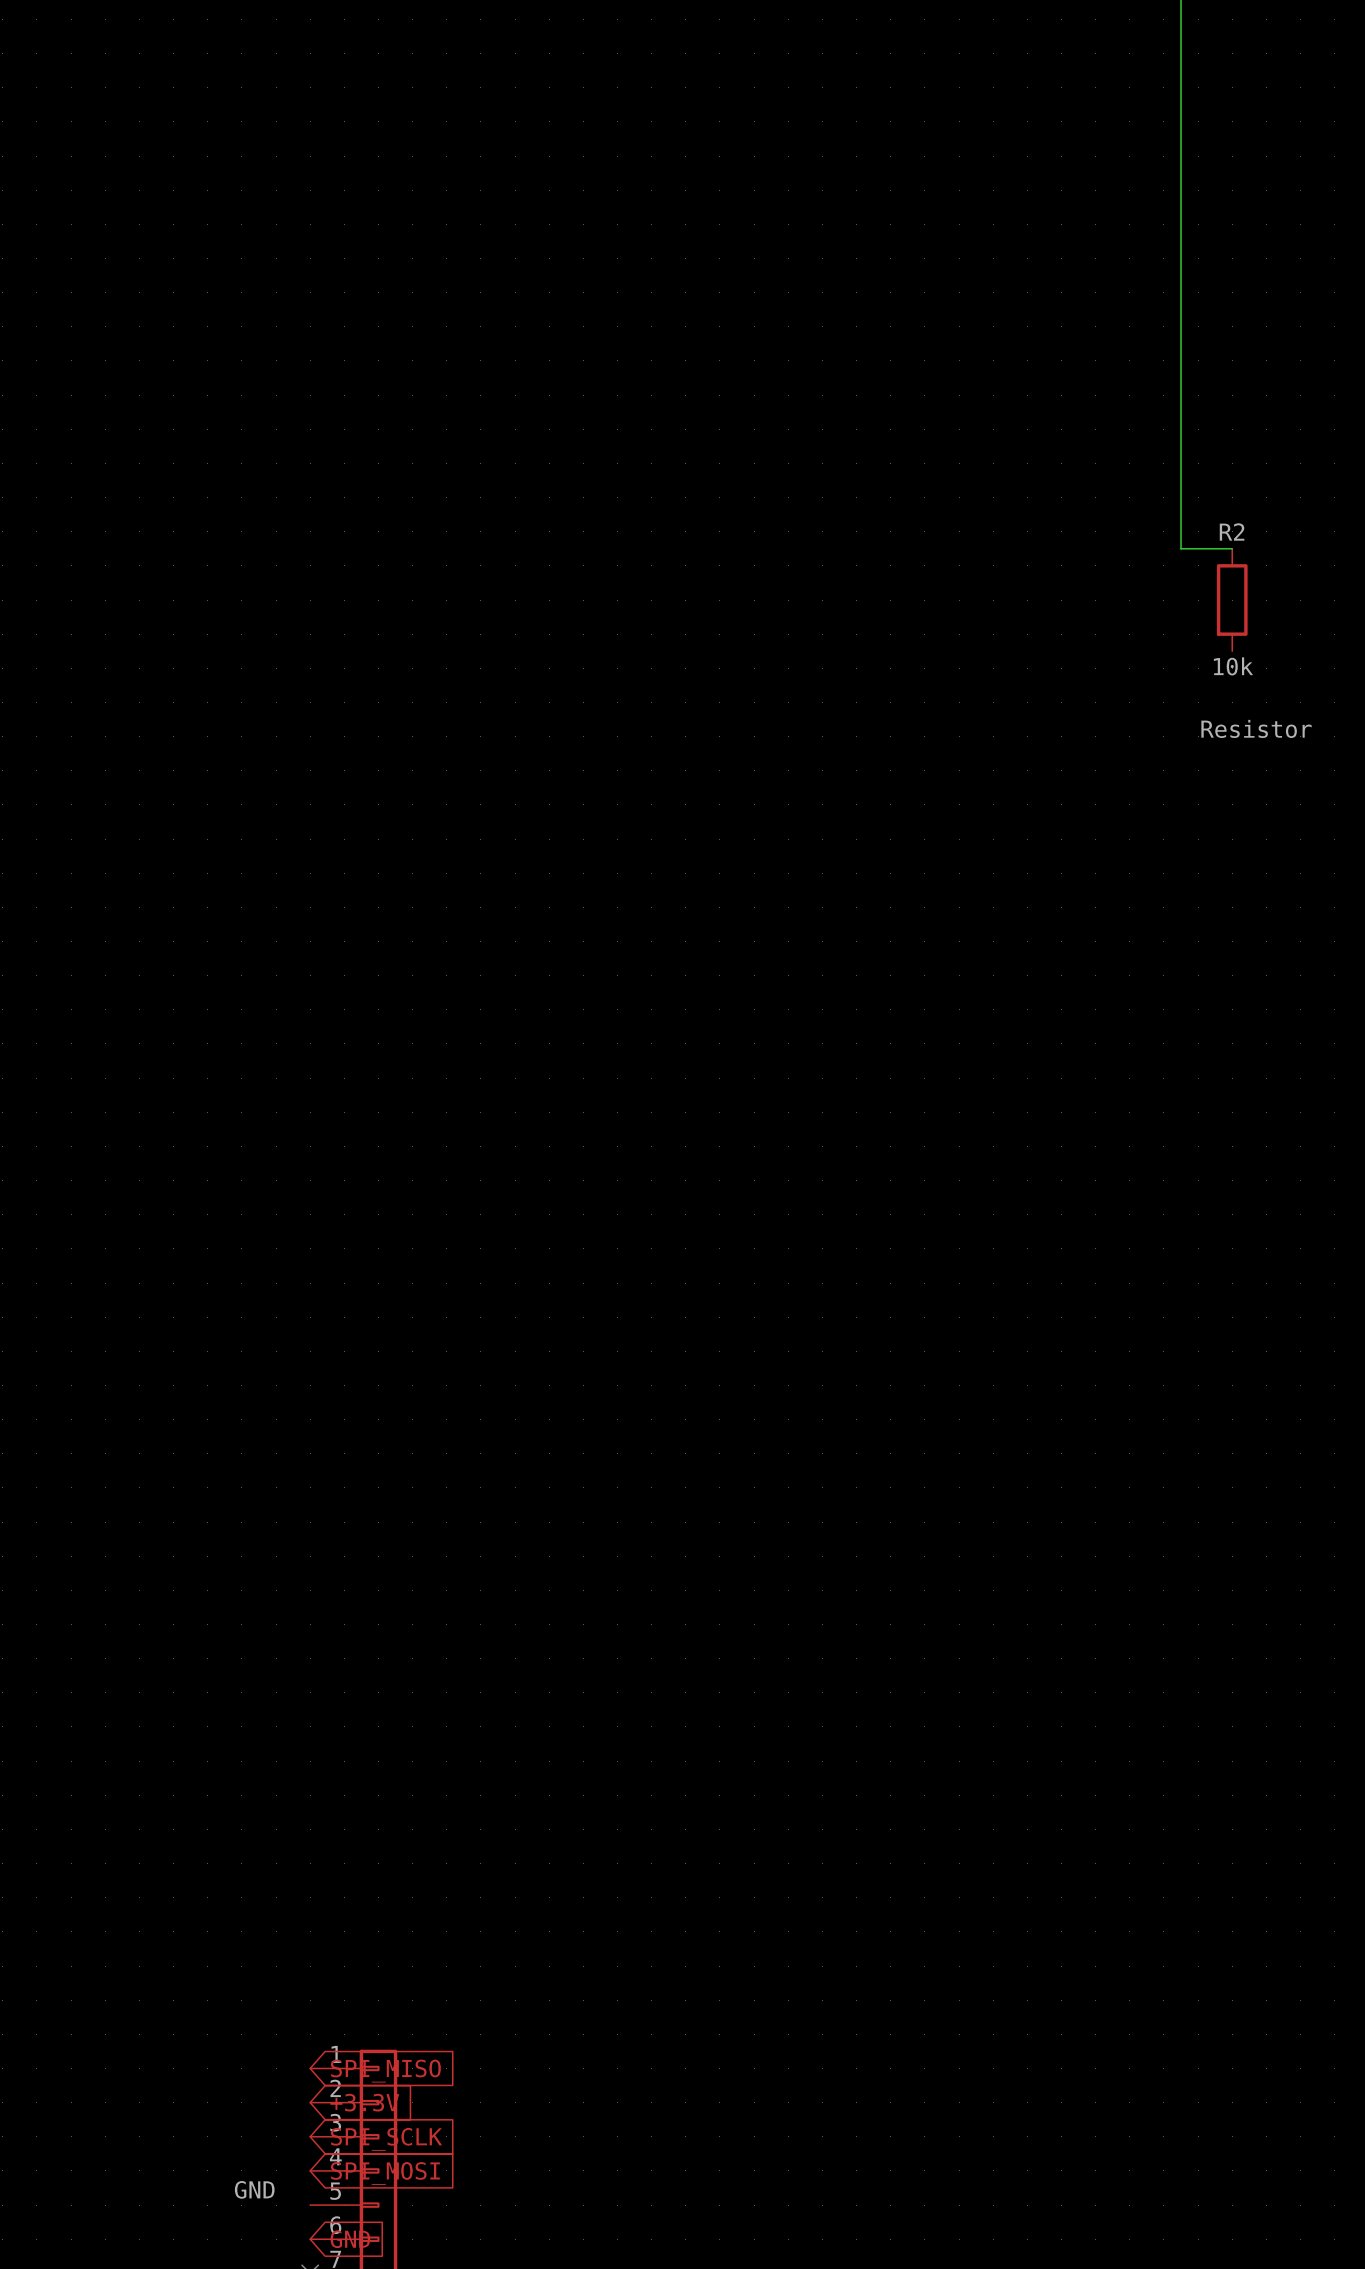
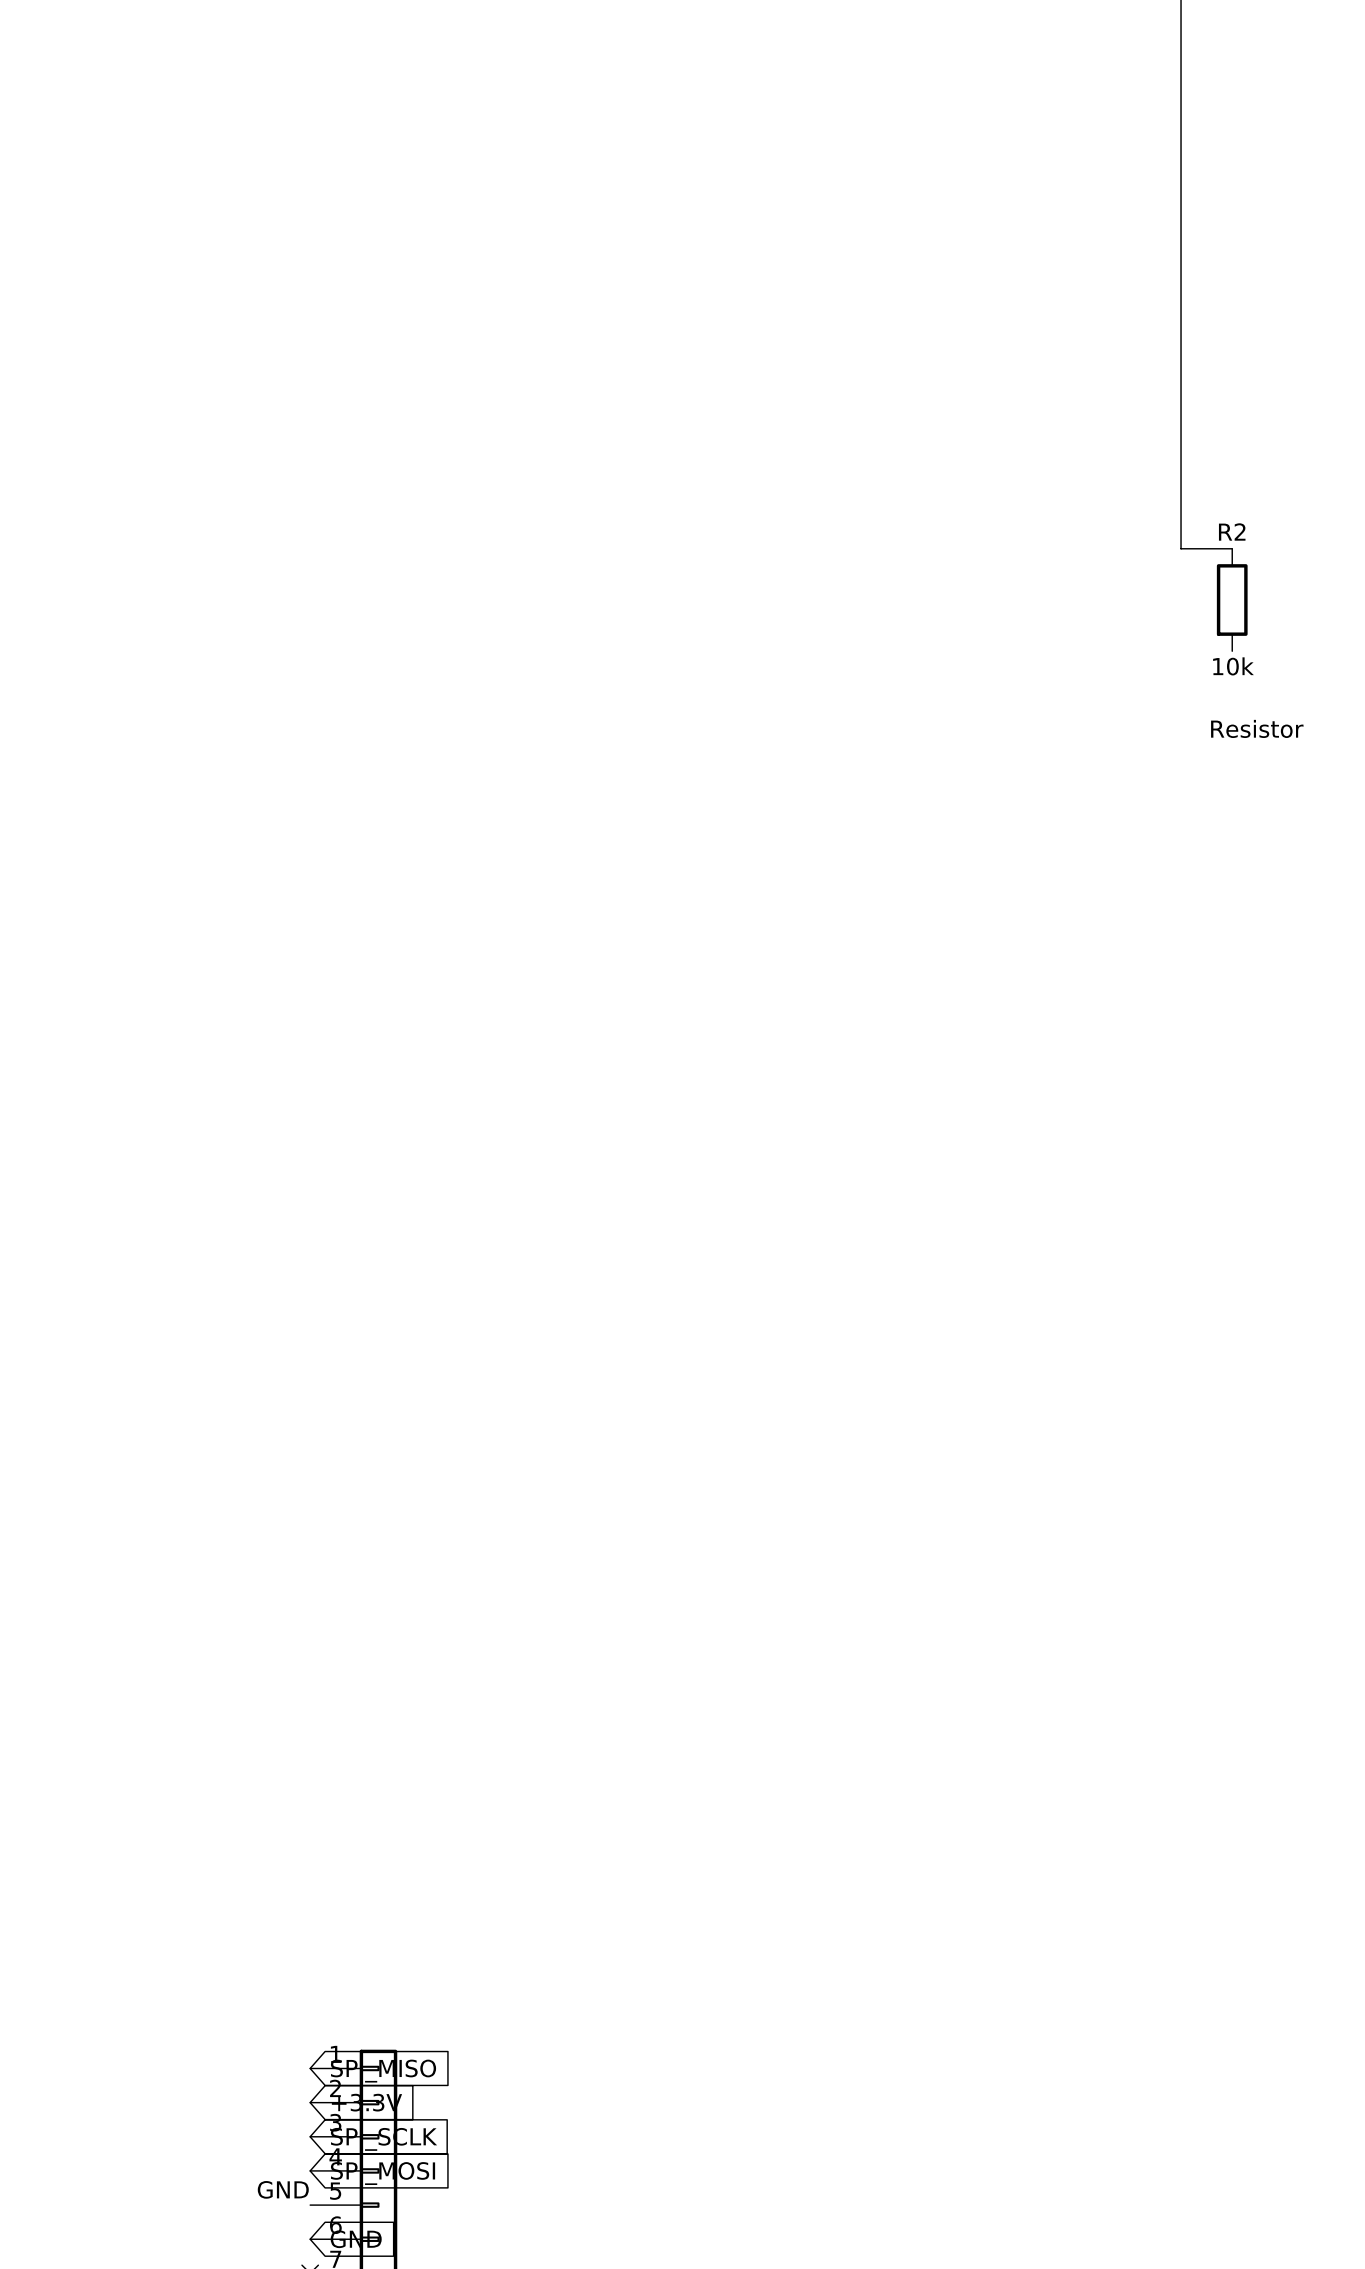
label position: GND (254, 2189) -> GND (283, 2189)

